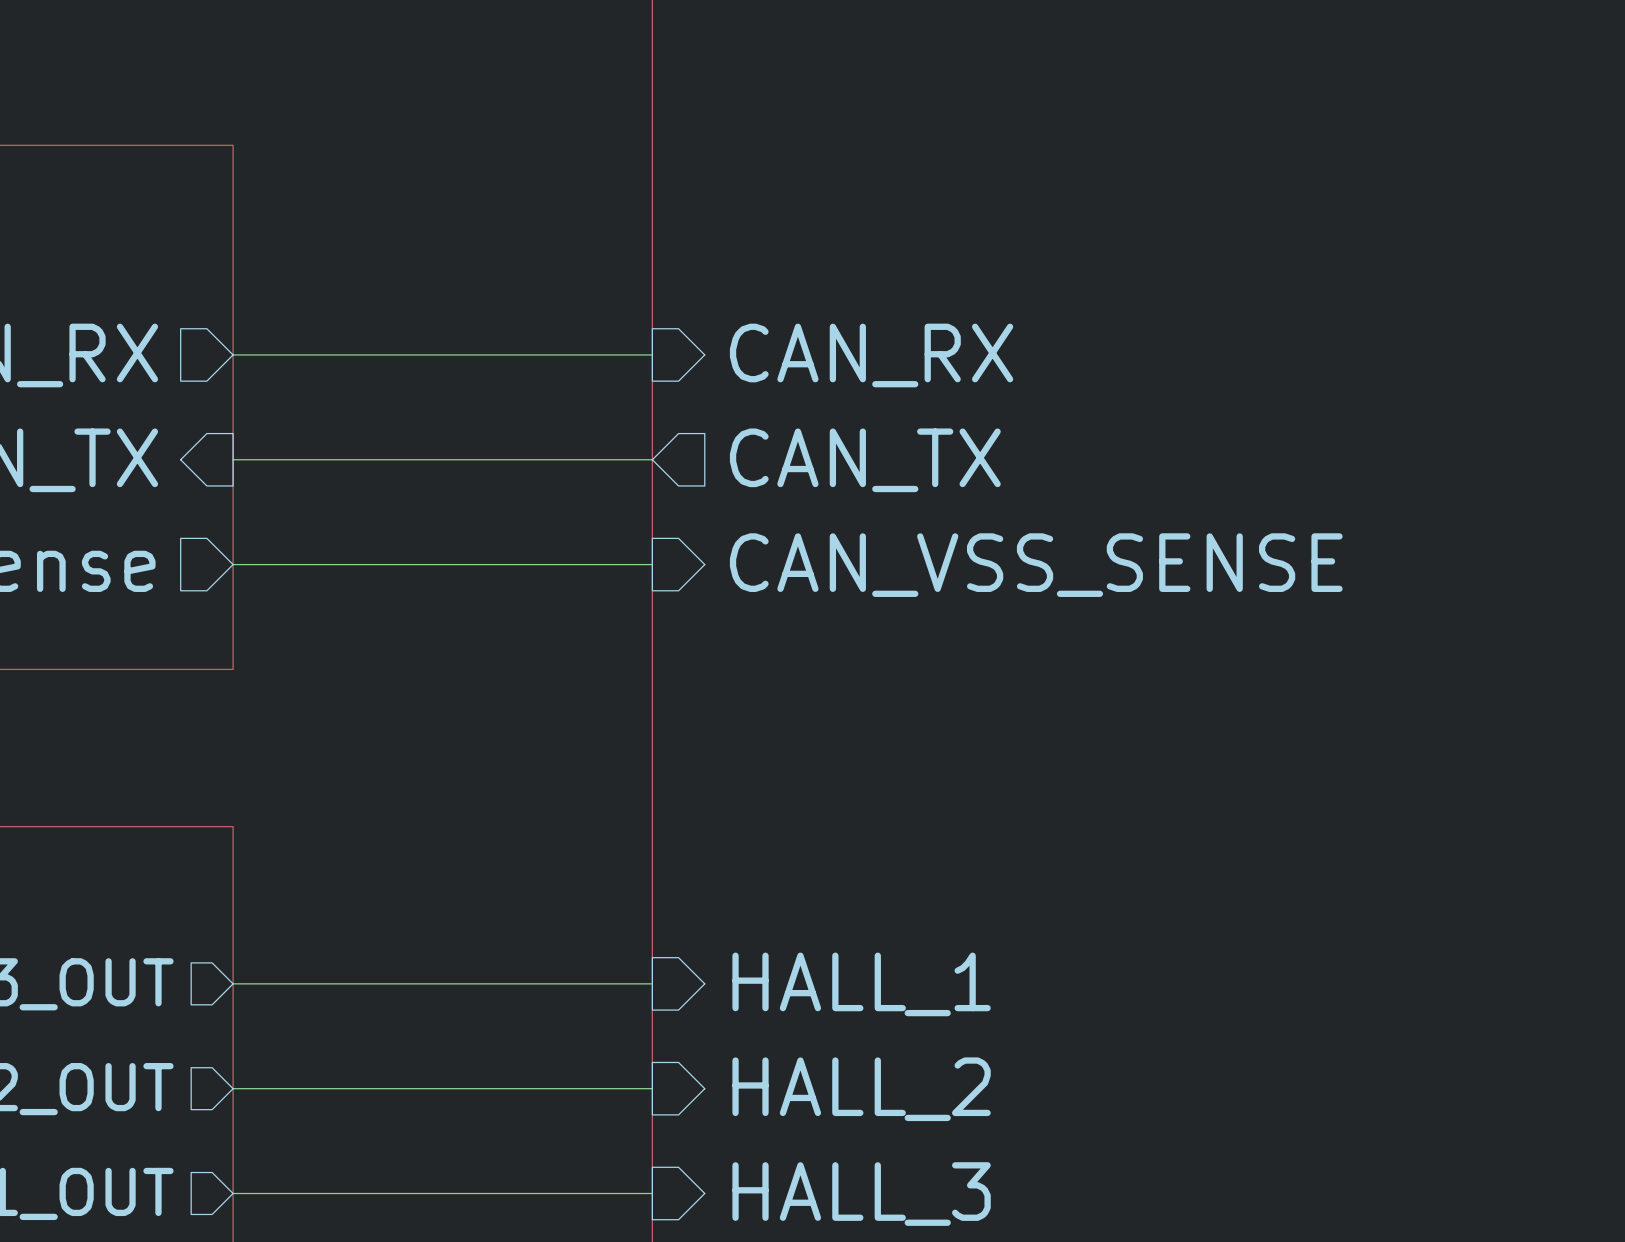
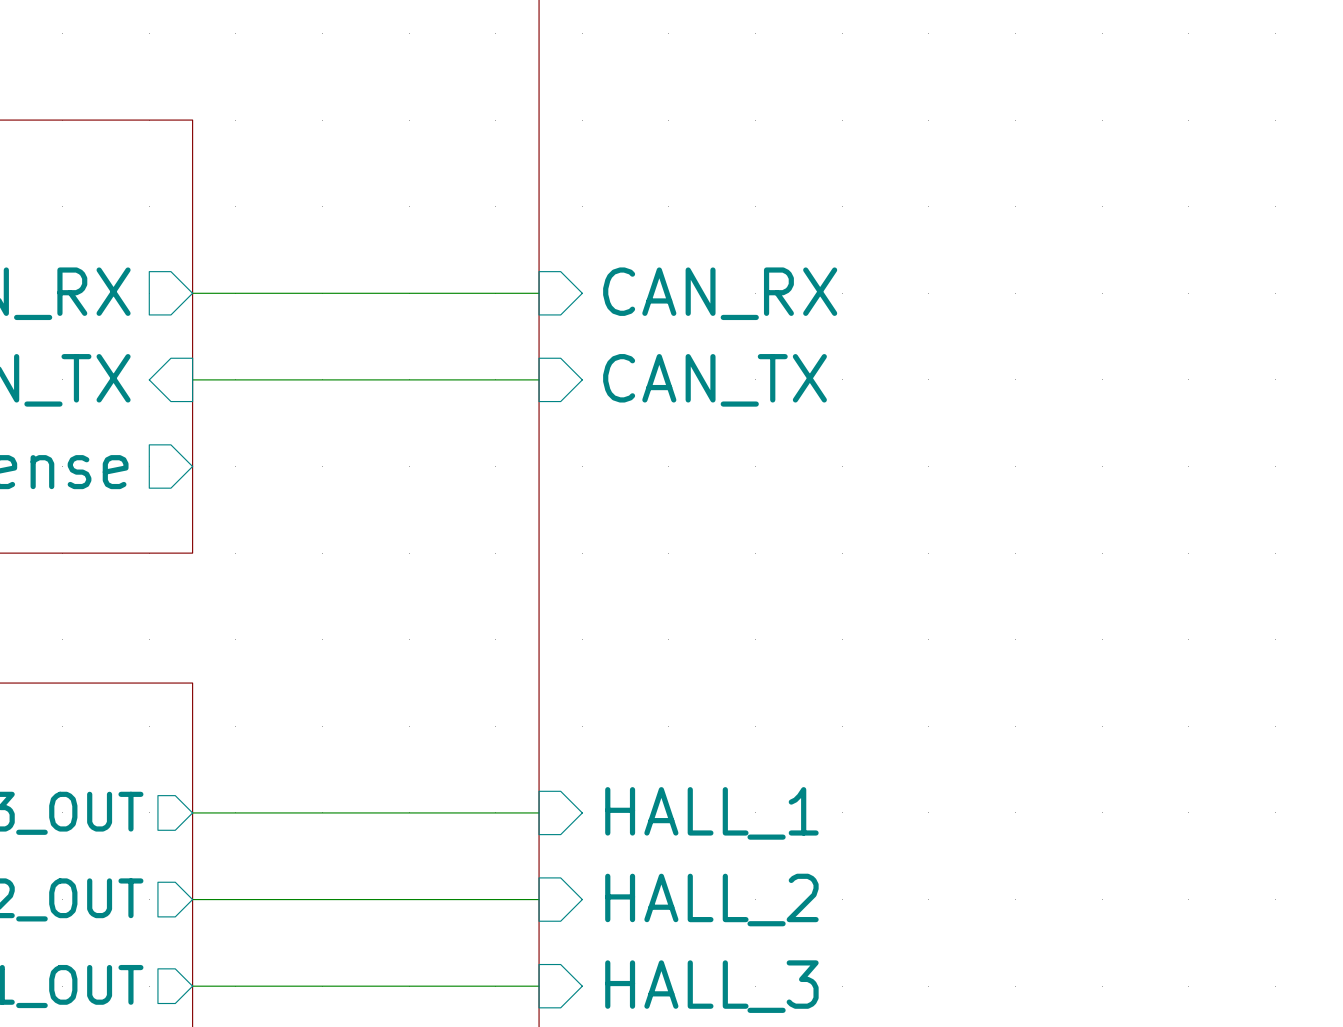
sheet pin shape: output (865, 460) -> input (715, 380)
wire: (233, 564) (652, 564) -> none
sheet pin: CAN_VSS_SENSE (1036, 565) -> none

